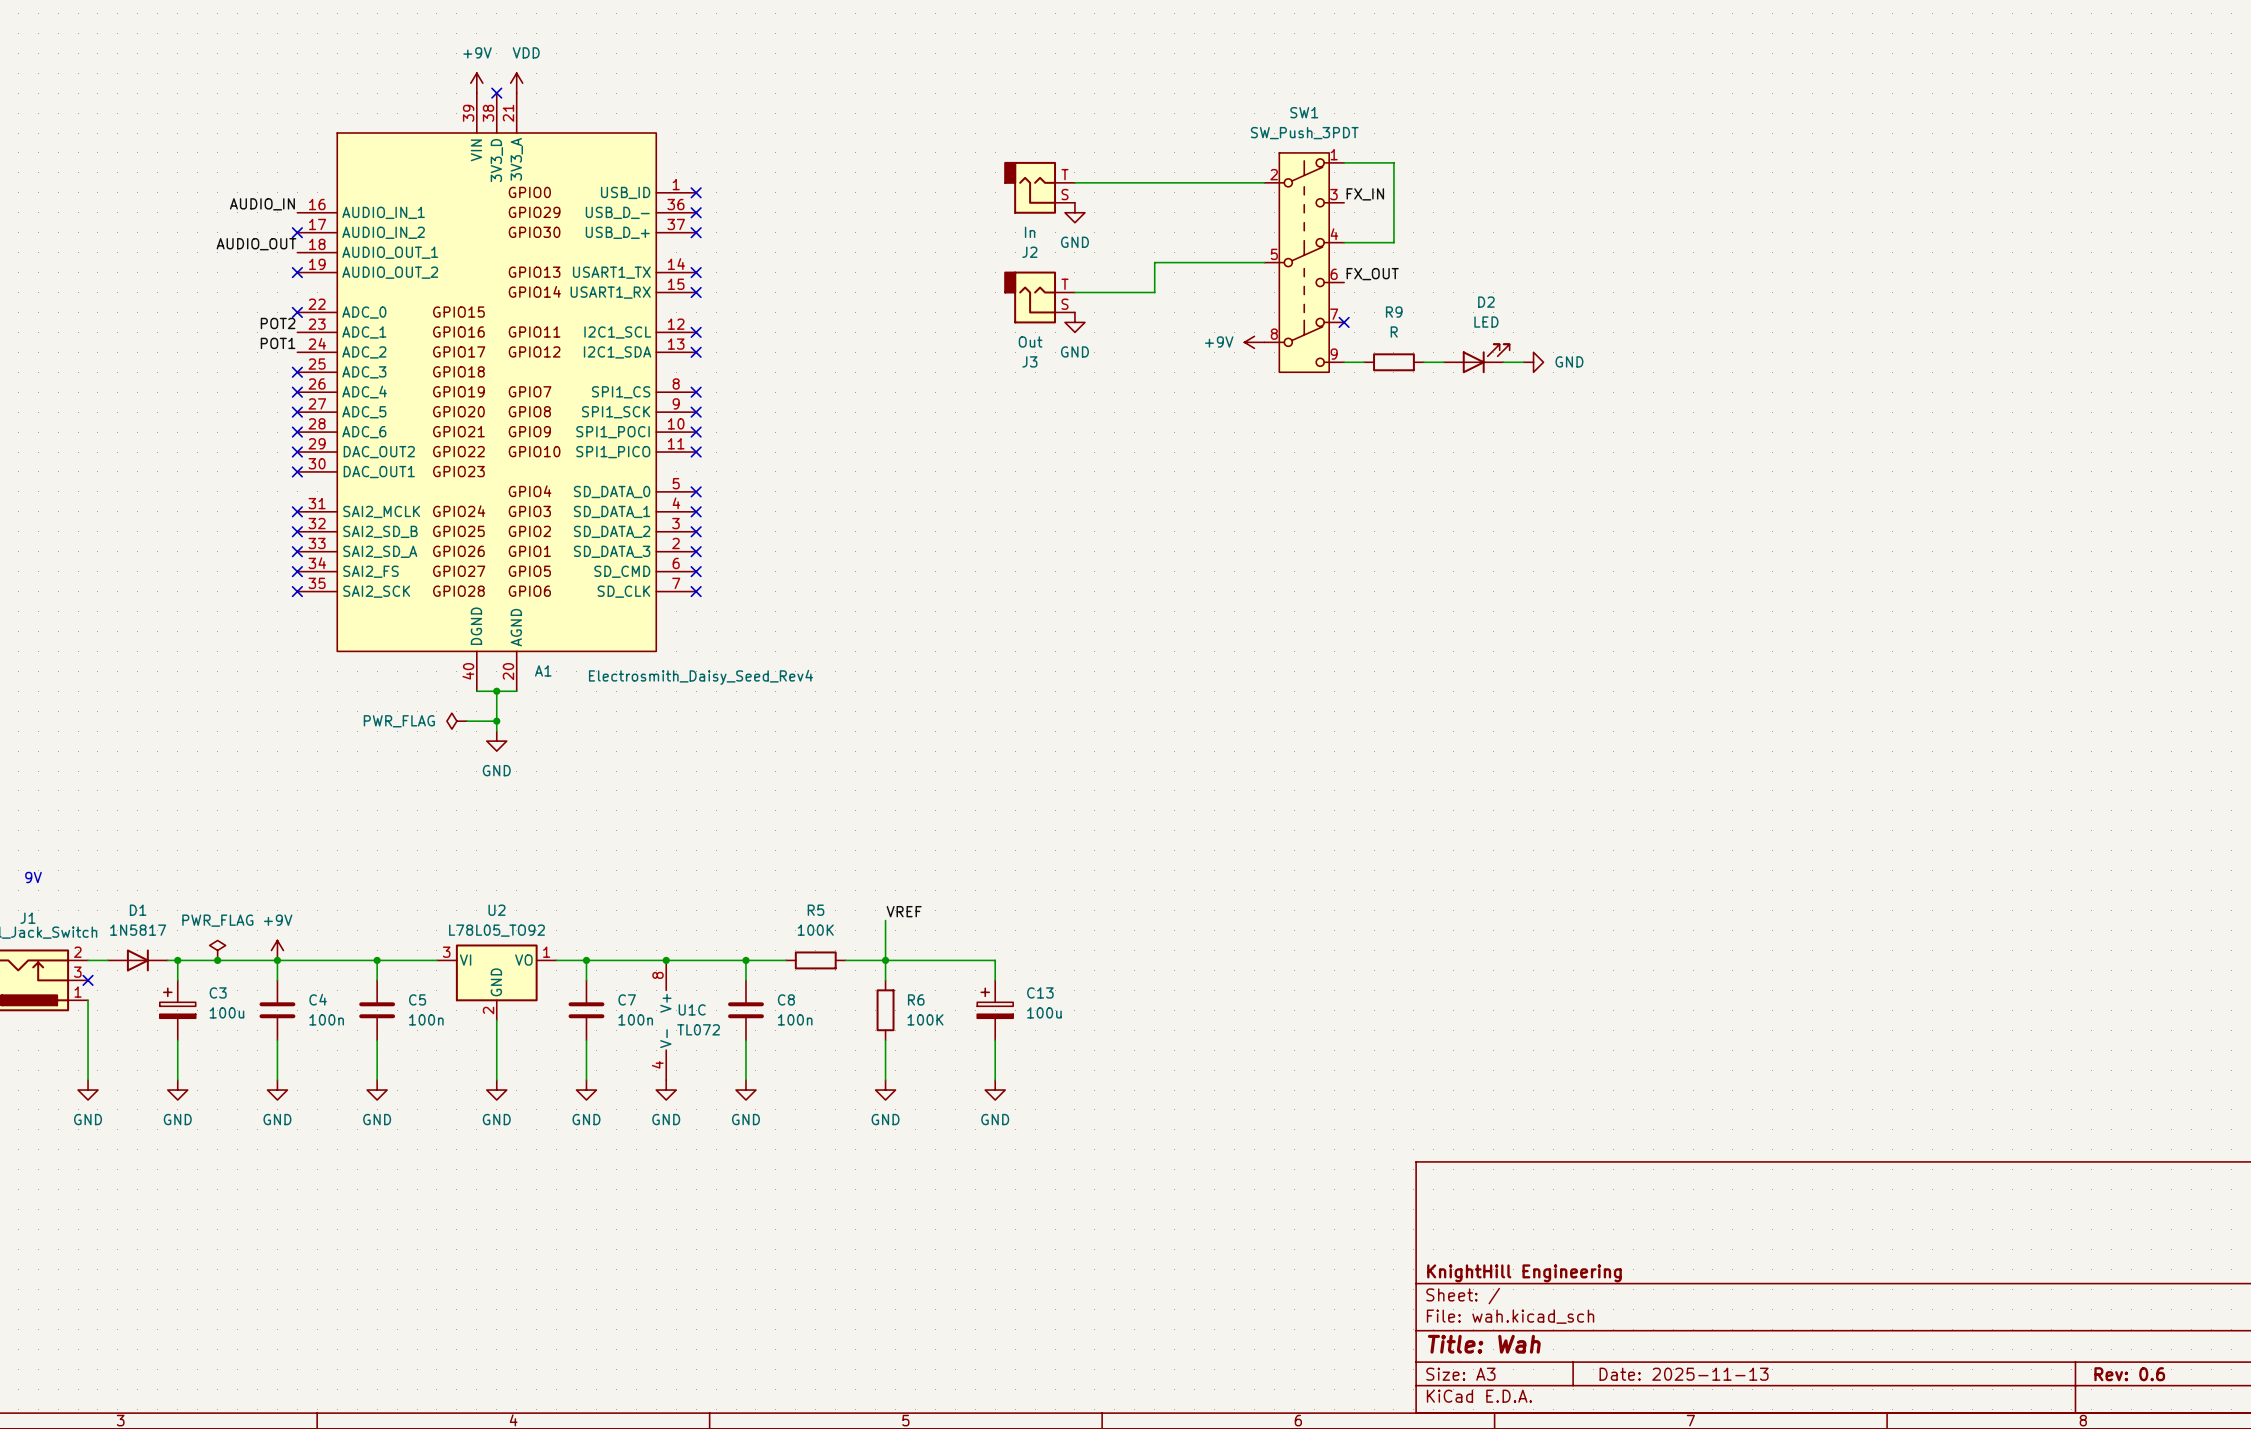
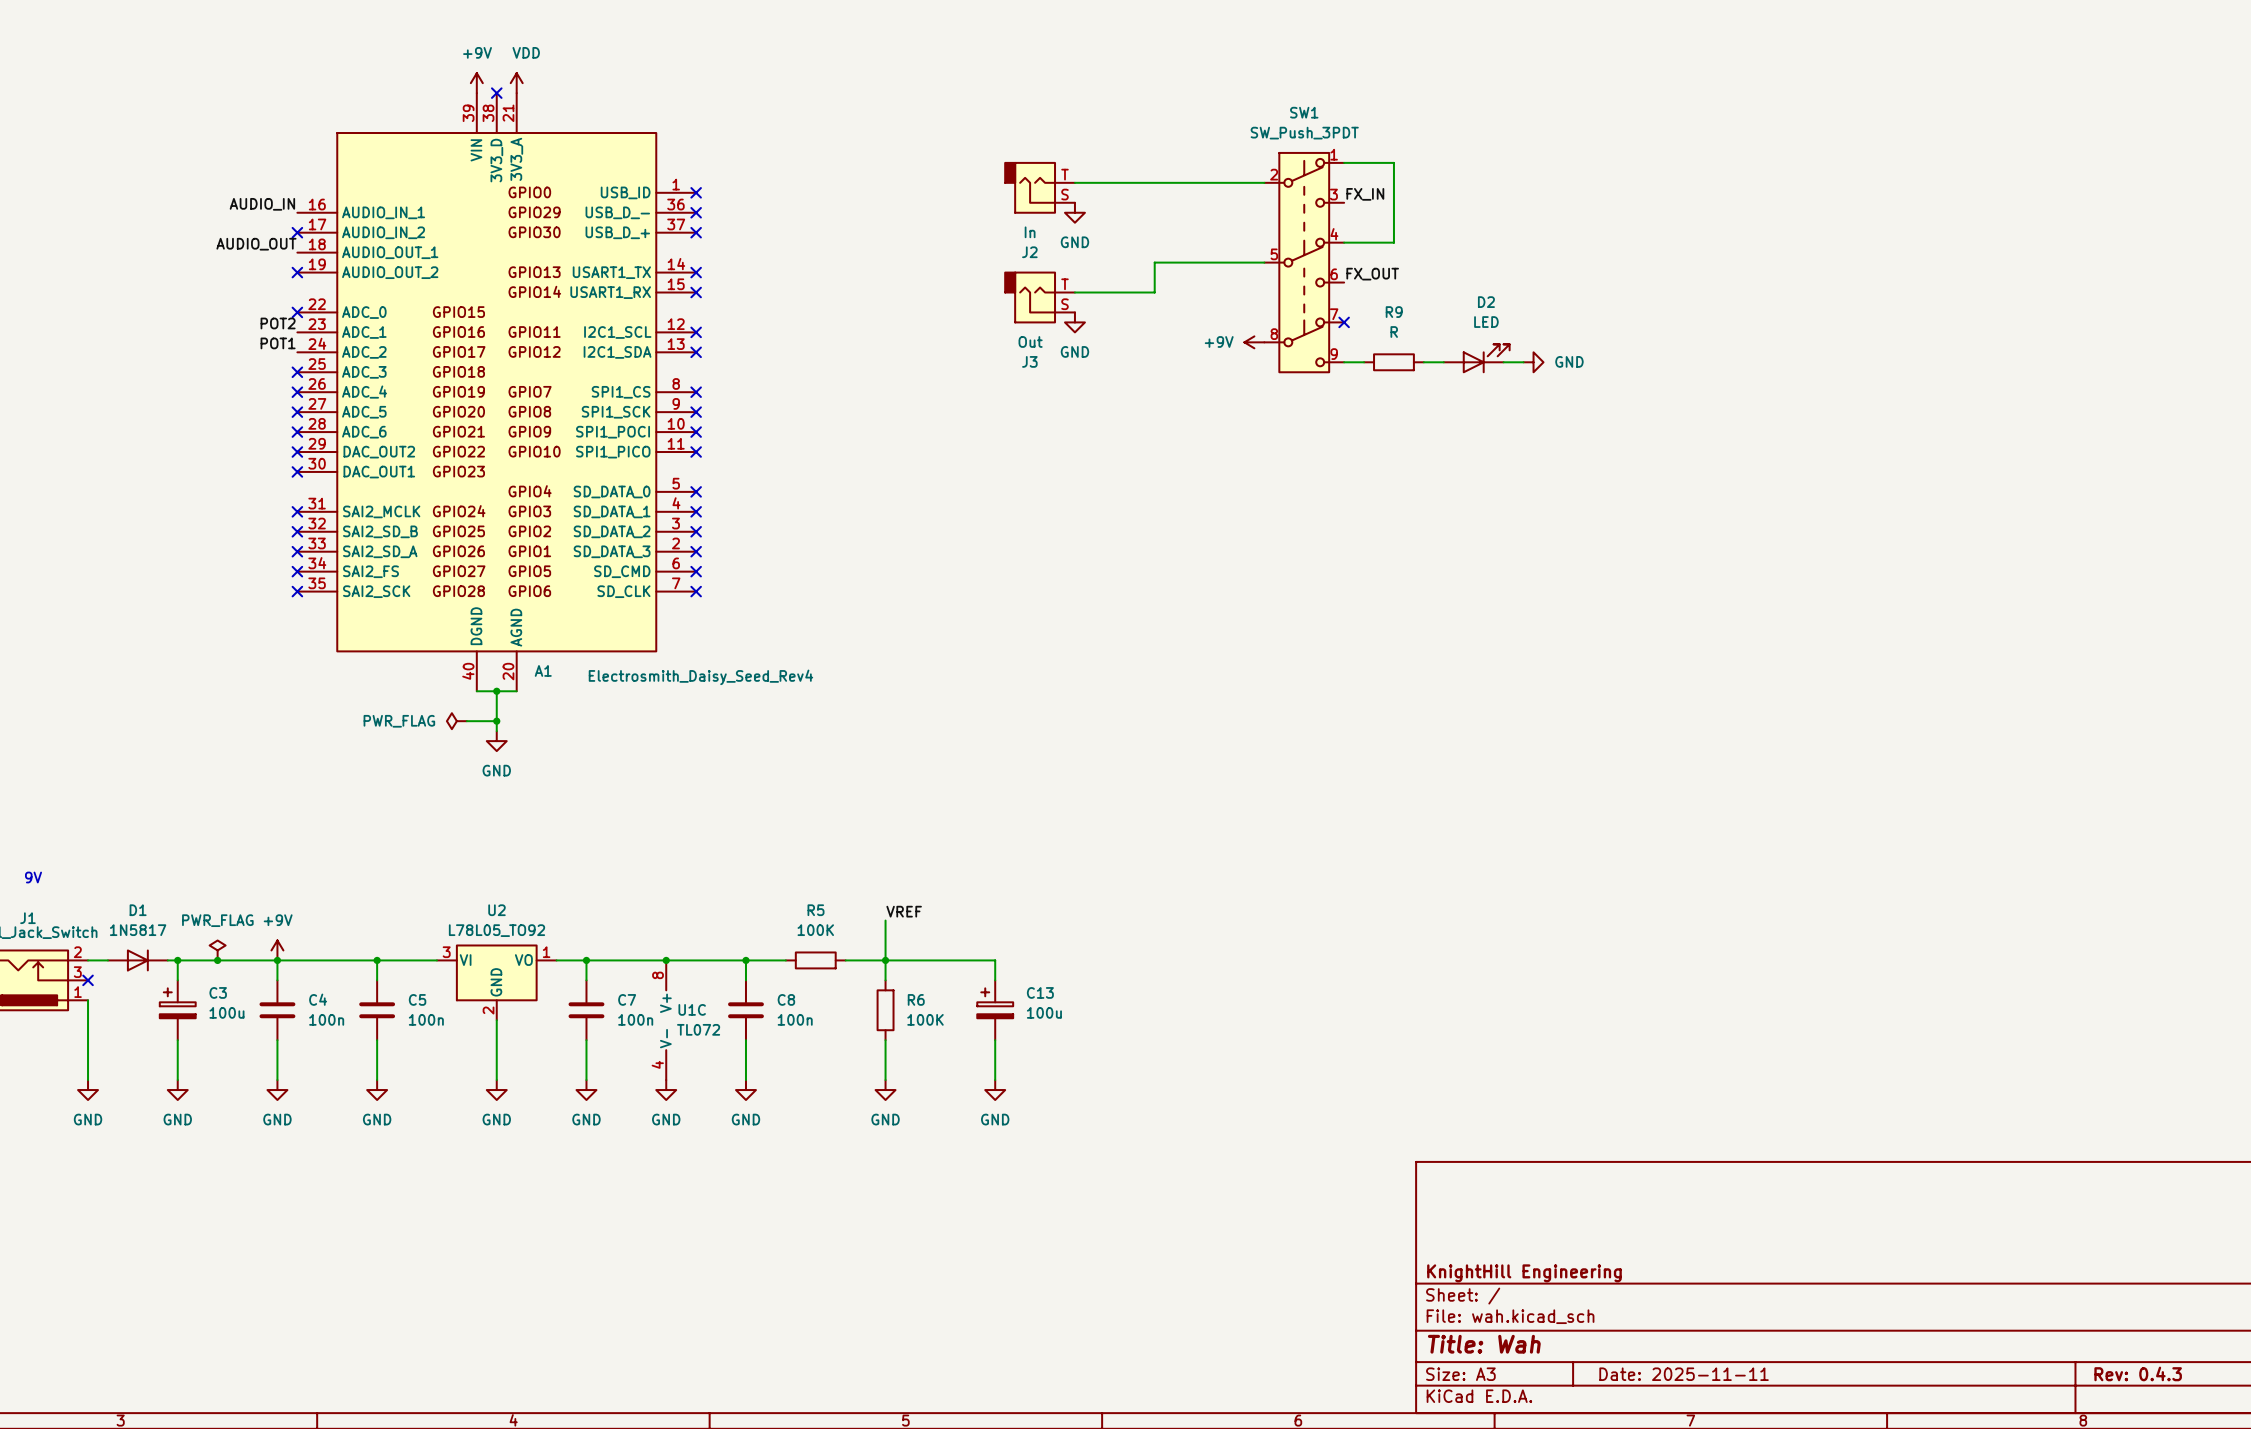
title block: Date: 2025-11-13 (1684, 1374) -> Date: 2025-11-11 (1684, 1374)
title block: Rev: 0.6 (2129, 1374) -> Rev: 0.4.3 (2138, 1373)

